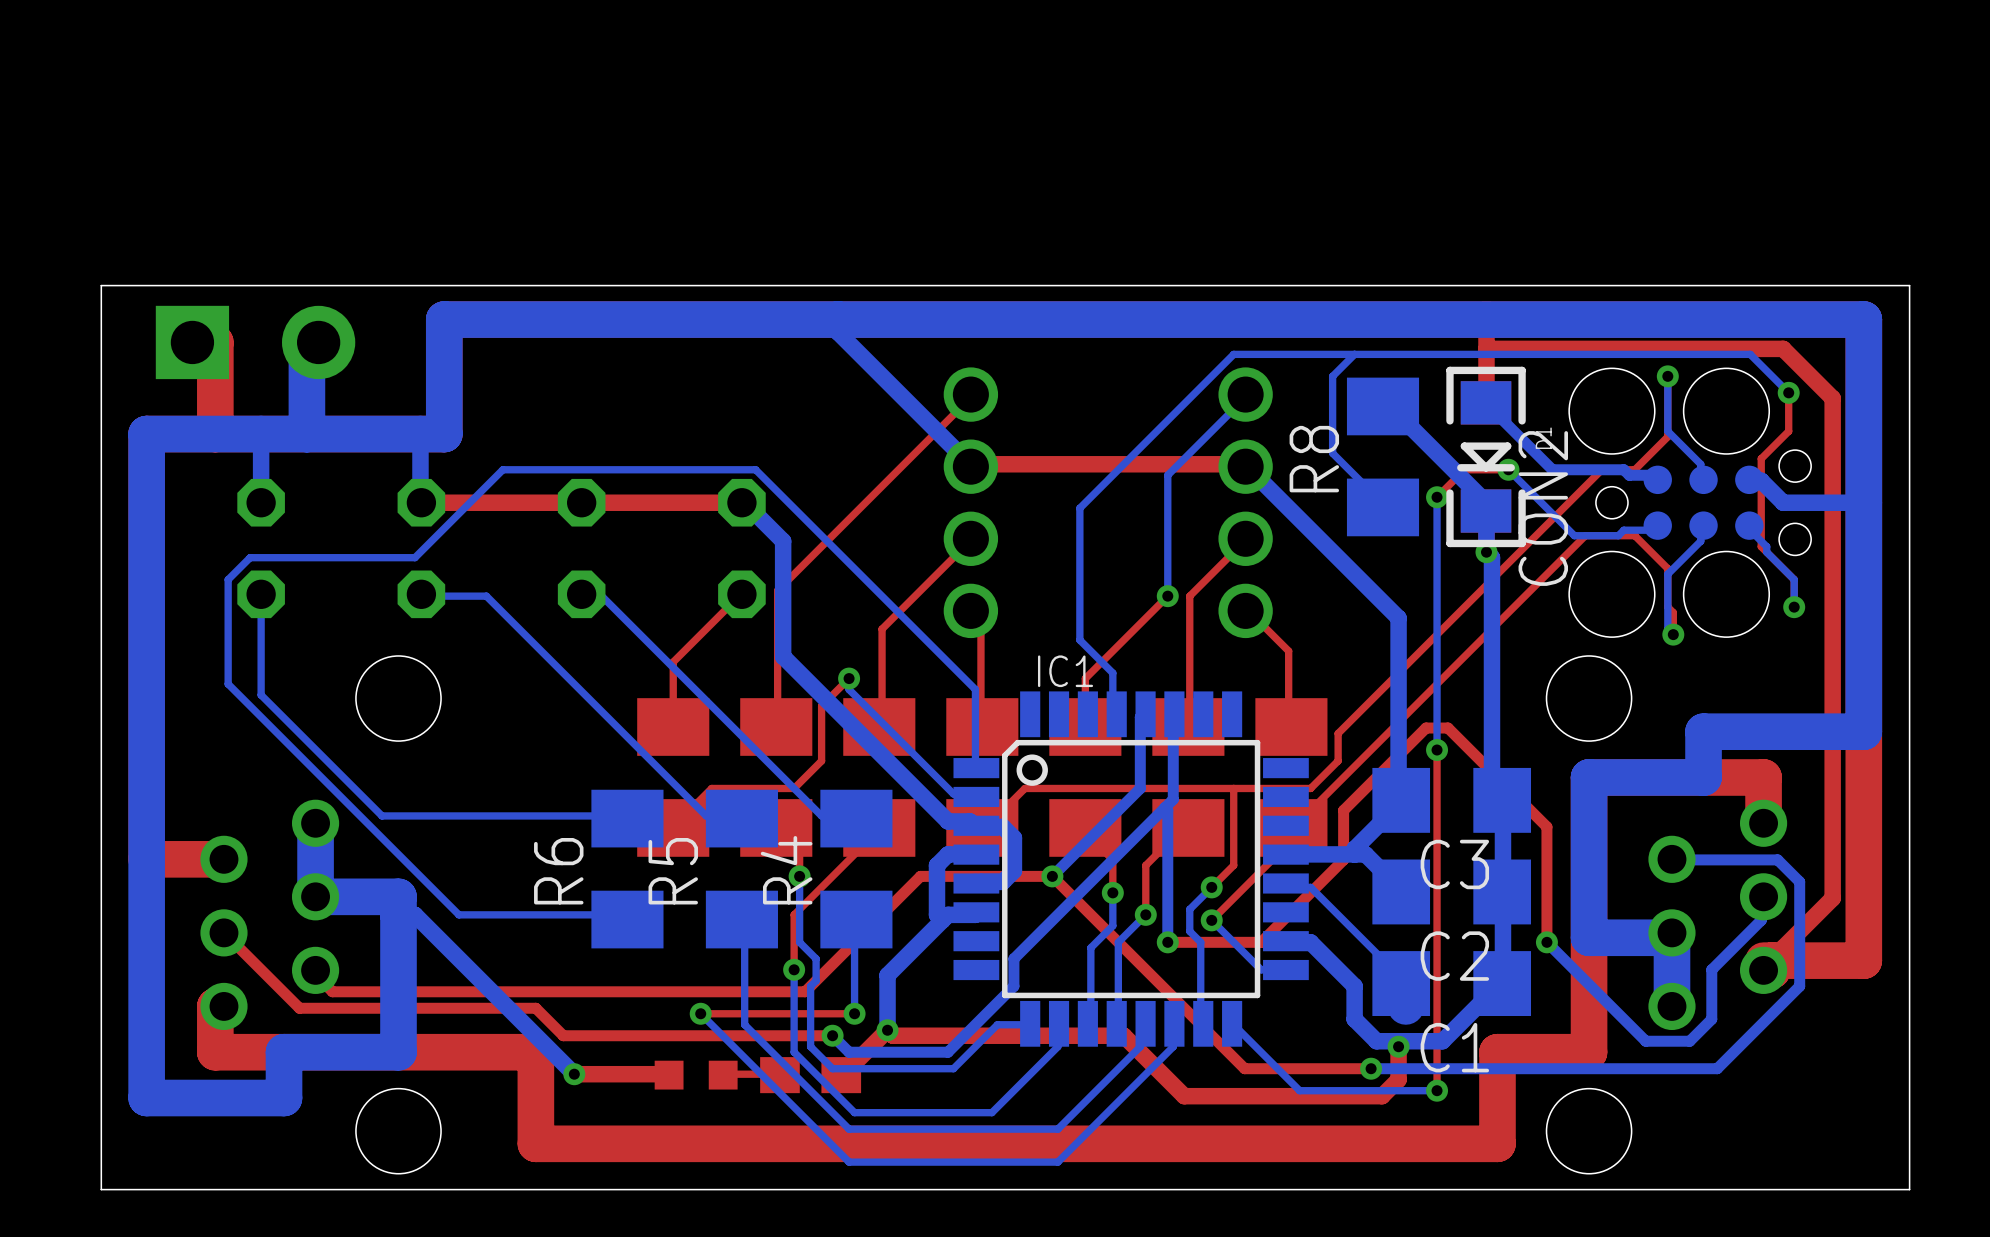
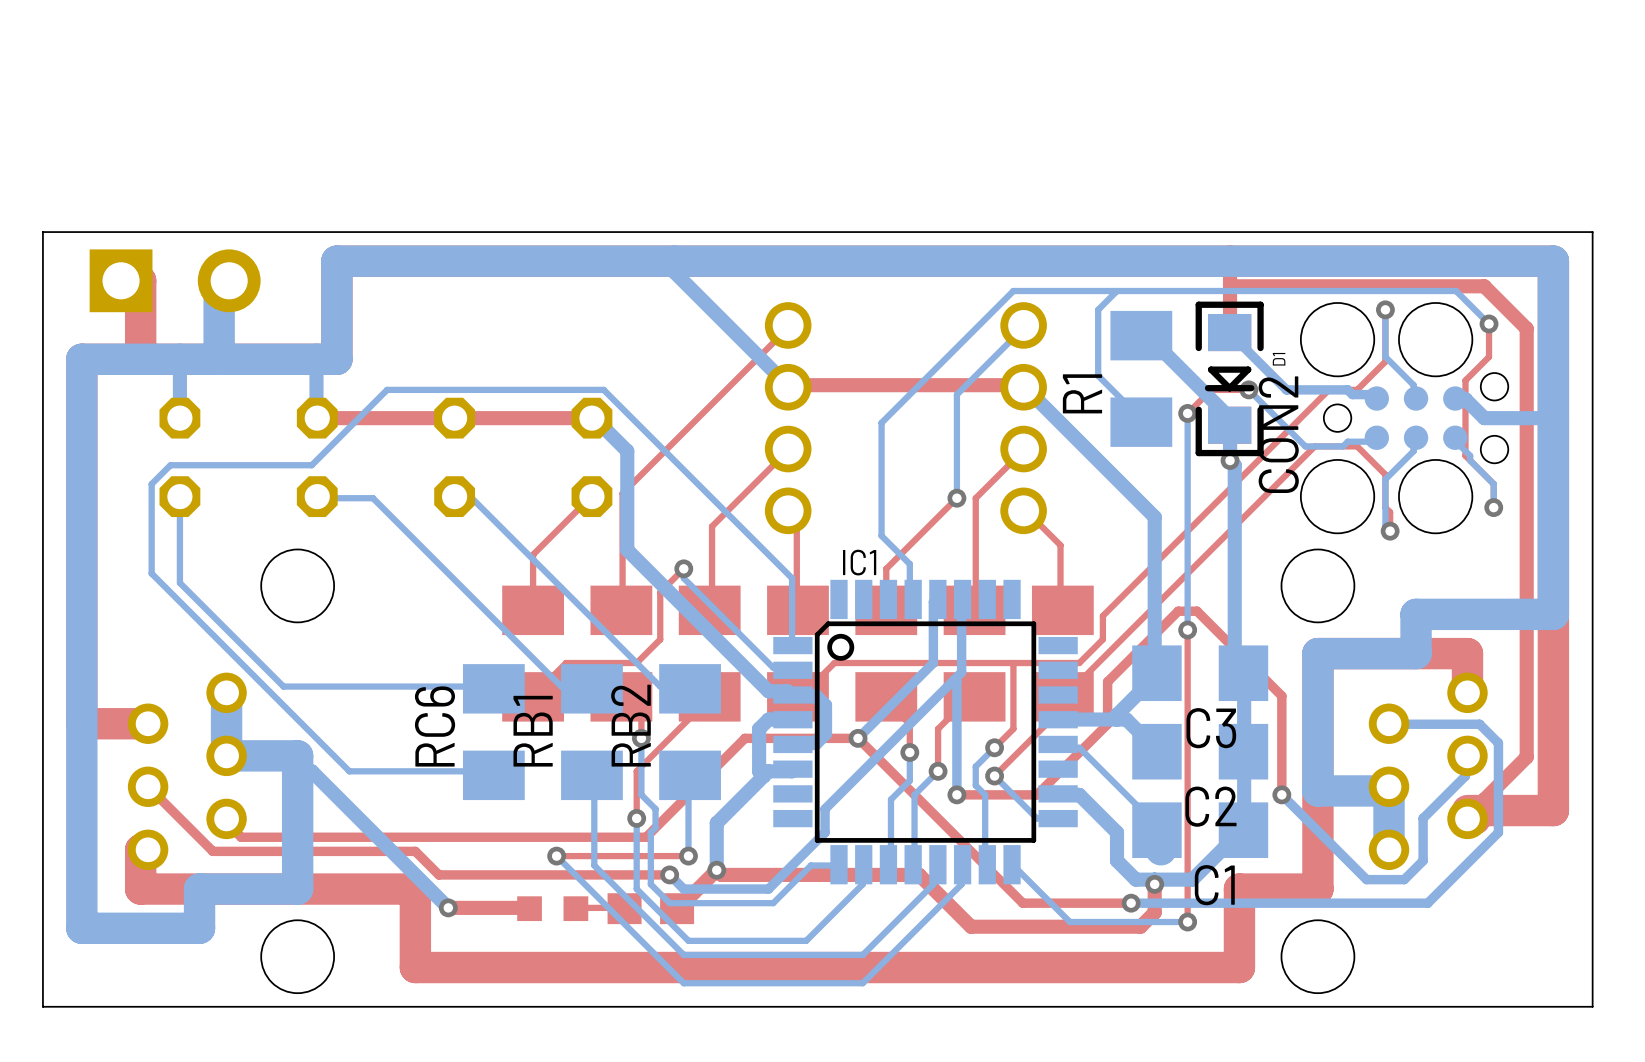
R8 name: R8 (1314, 459) -> R1 (1082, 393)
R4 name: R4 (786, 870) -> RB2 (630, 725)
R6 name: R6 (558, 871) -> RC6 (435, 726)
R5 name: R5 (673, 871) -> RB1 (533, 731)

